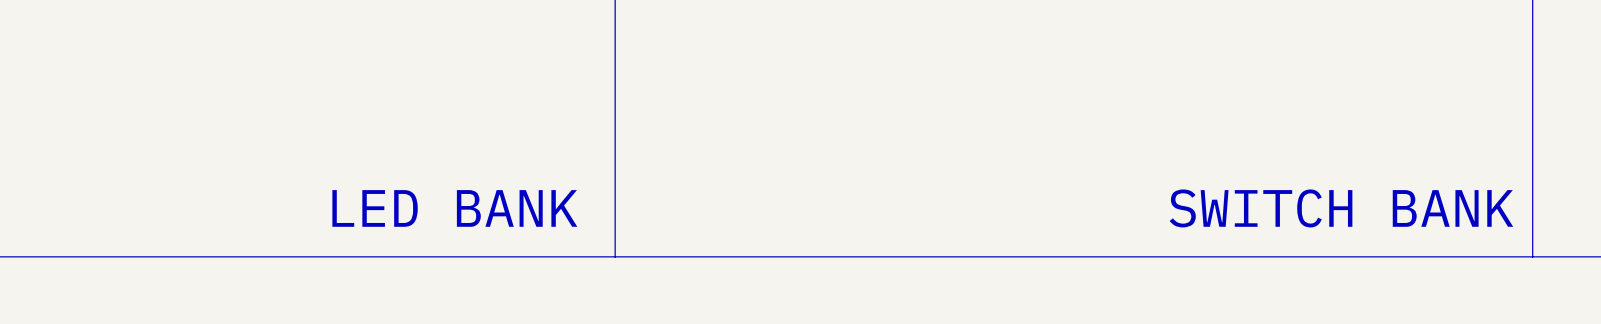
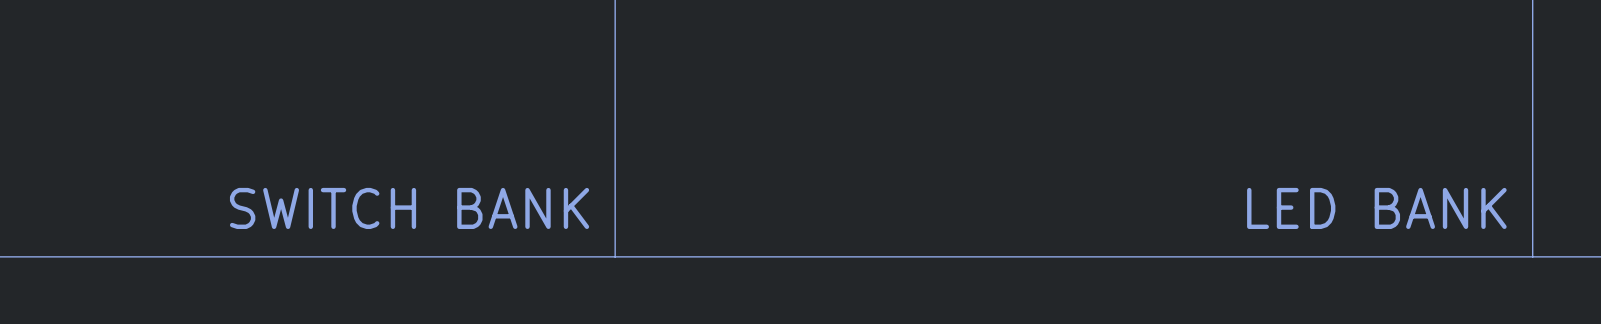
text: LED BANK (454, 208) -> SWITCH BANK (409, 208)
text: SWITCH BANK (1341, 208) -> LED BANK (1376, 208)

